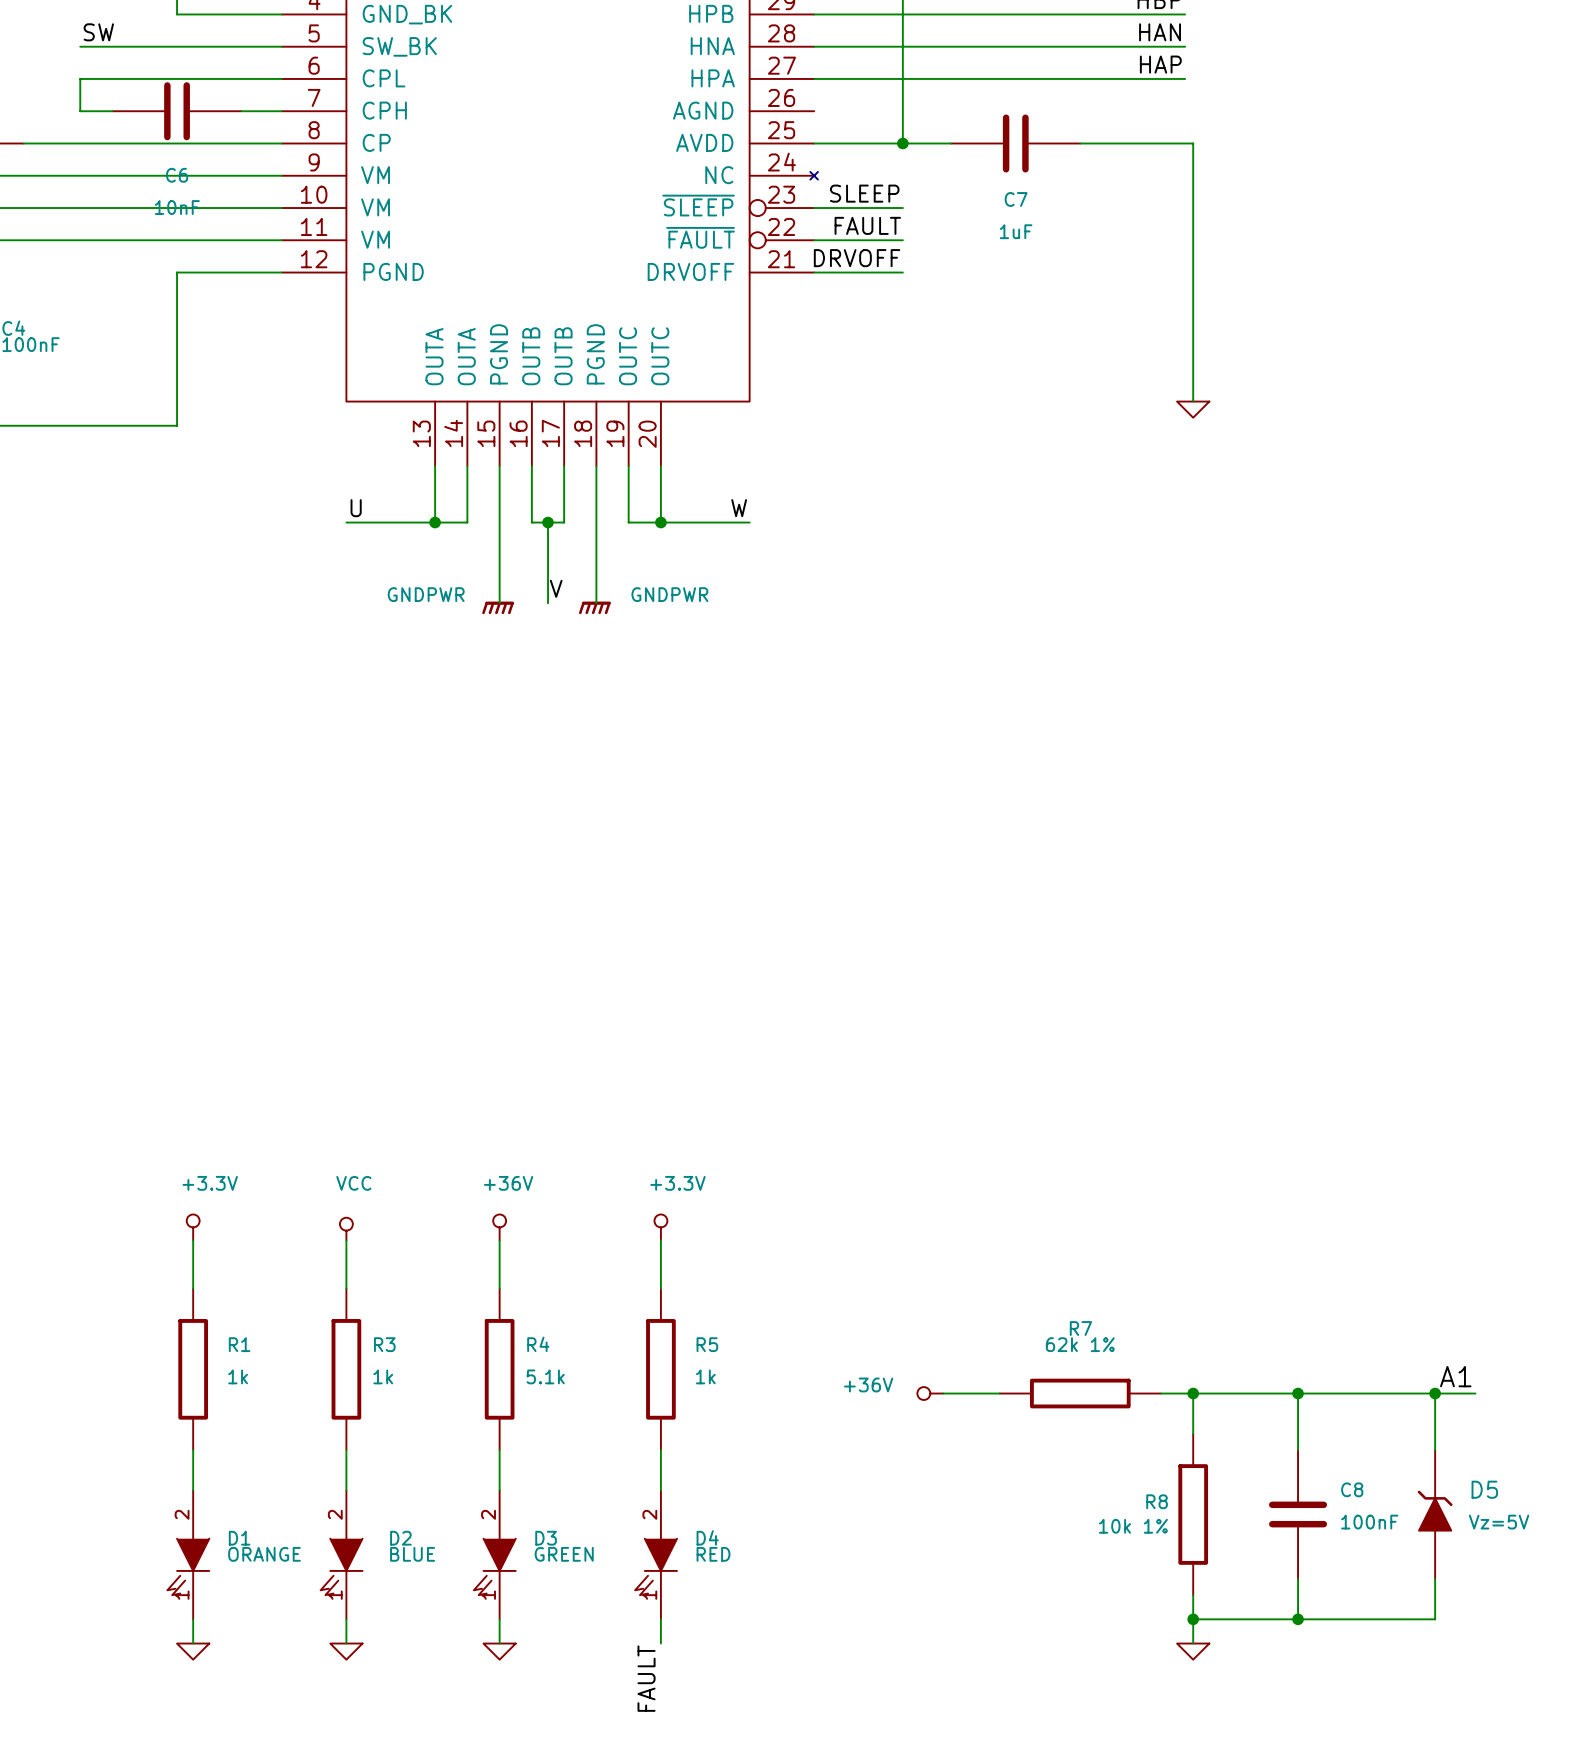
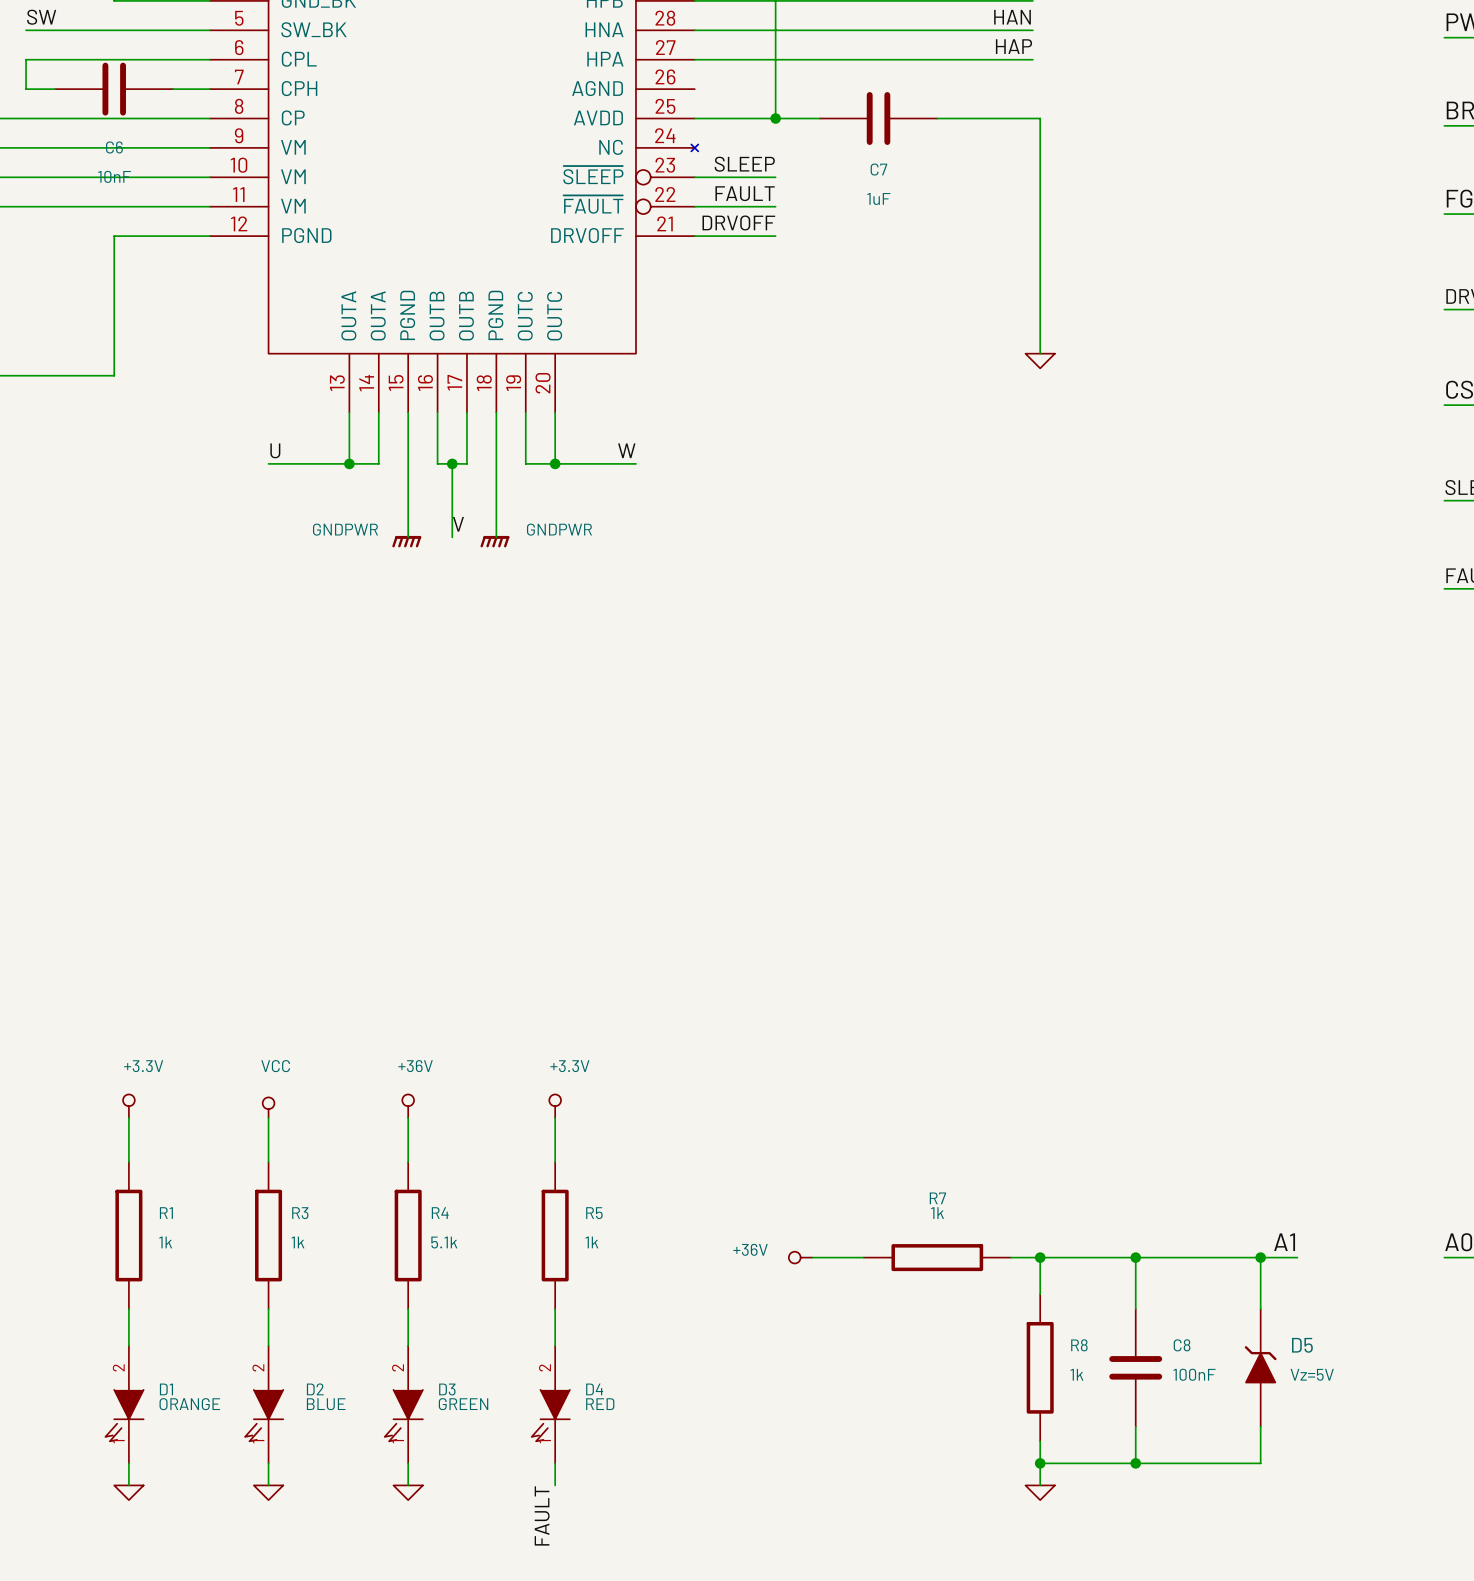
R7 value: 62k 1% (1080, 1344) -> 1k (937, 1213)
R8 name position: R8 (1157, 1501) -> R8 (1079, 1345)
R8 value: 10k 1% (1133, 1526) -> 1k (1076, 1374)

